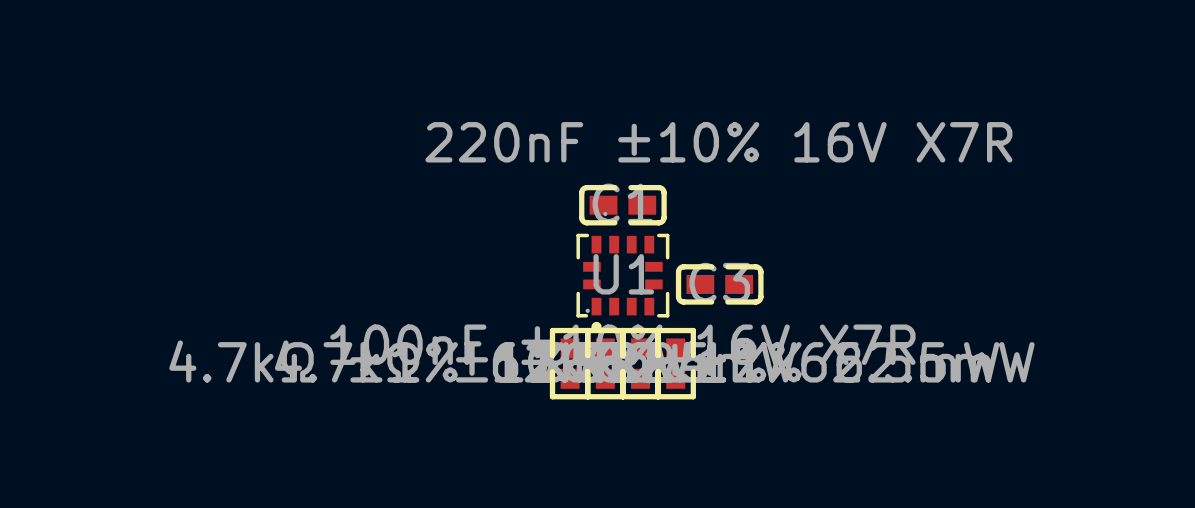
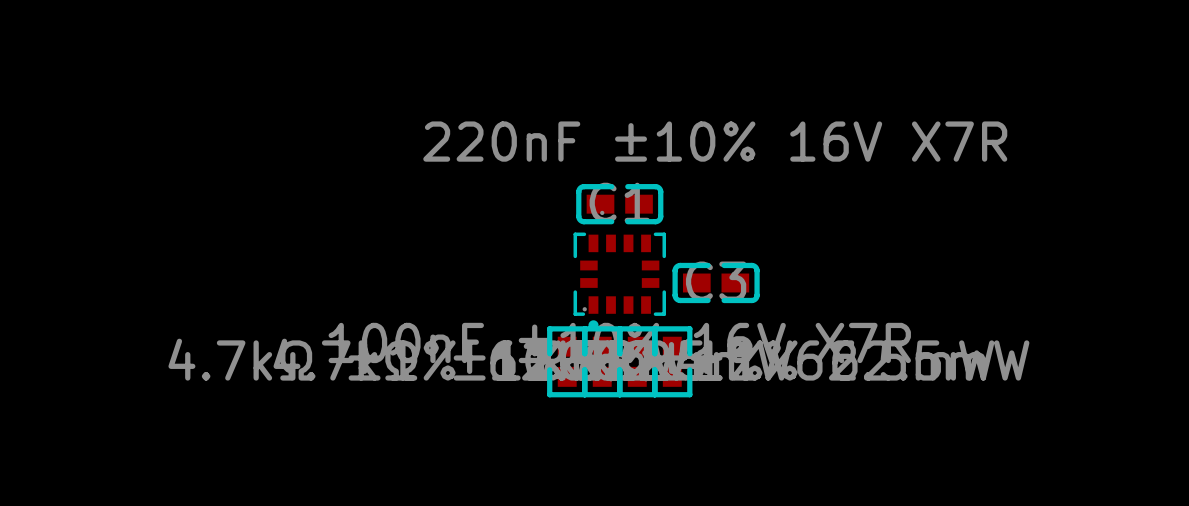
U1 name: U1 (623, 274) -> none

